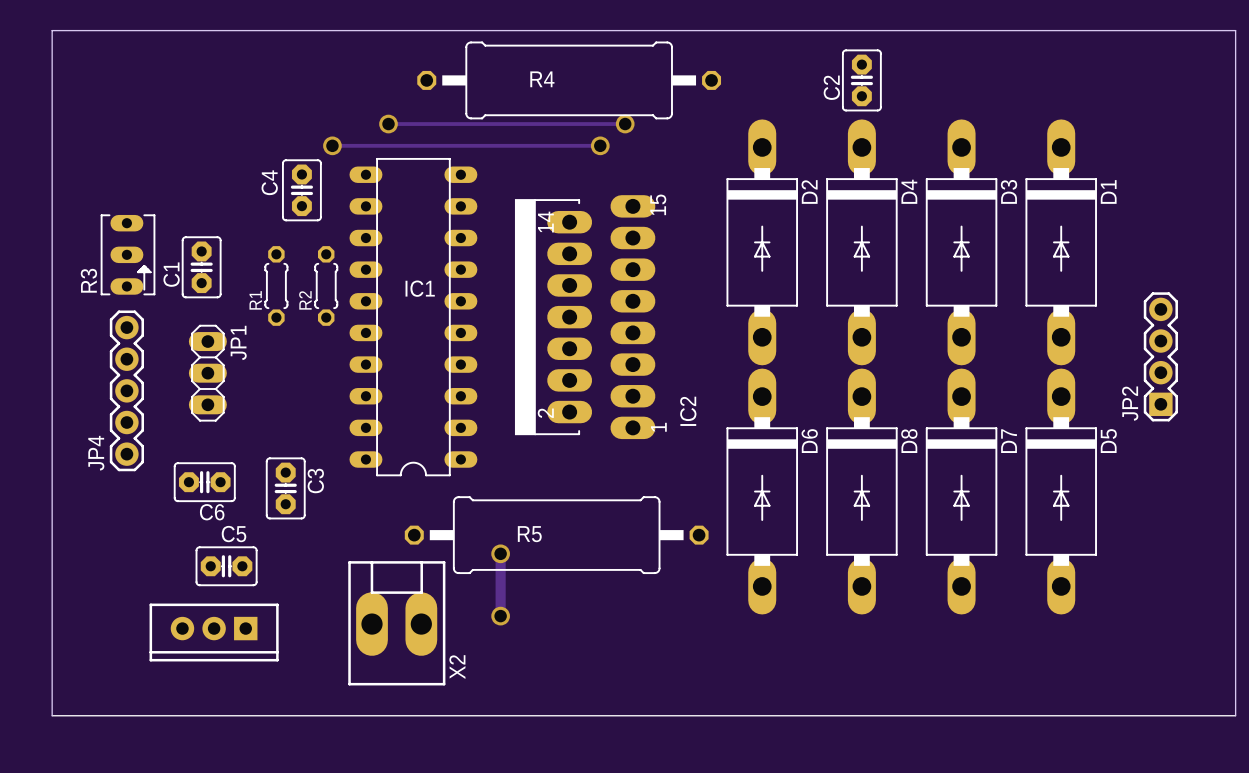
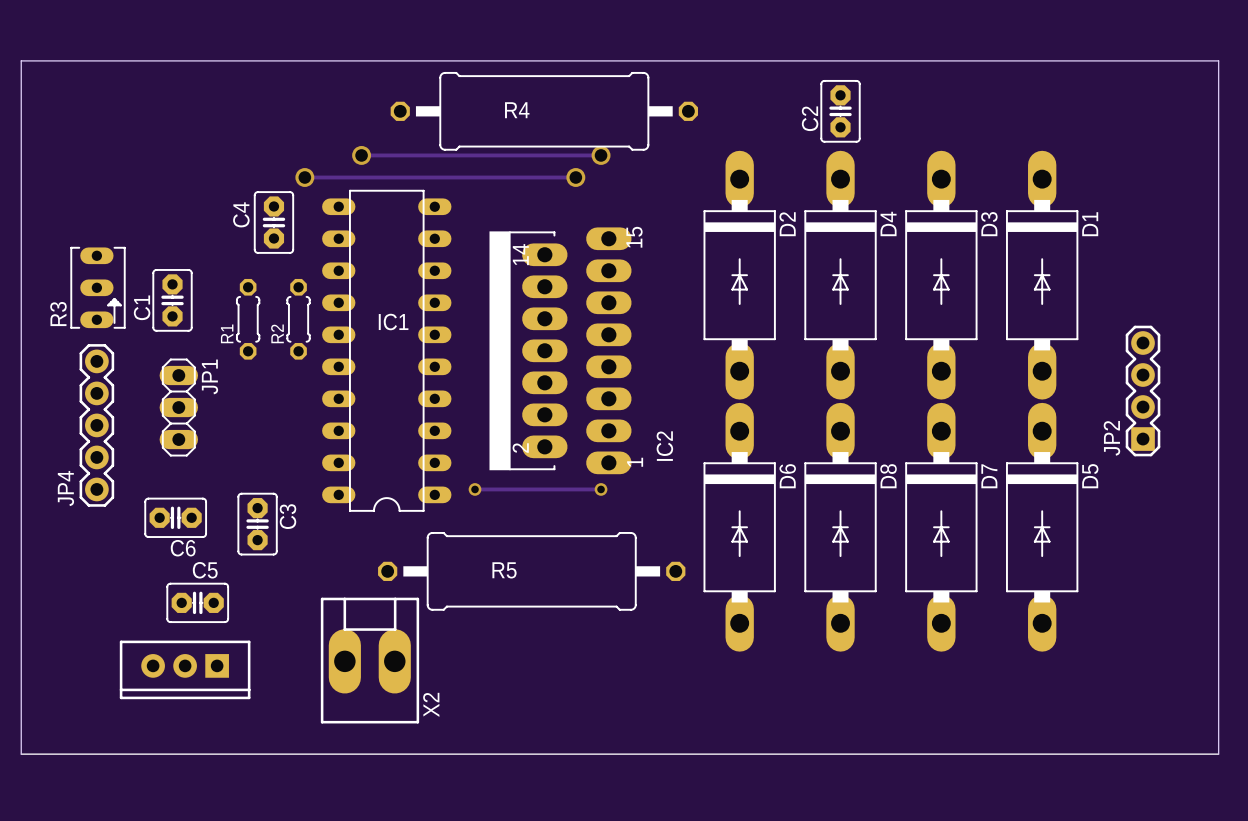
track: none -> (475, 489) (601, 489)
via: none -> (475, 489)
via: none -> (601, 489)
track: (500, 553) (500, 616) -> none
via: (500, 553) -> none
via: (500, 616) -> none

